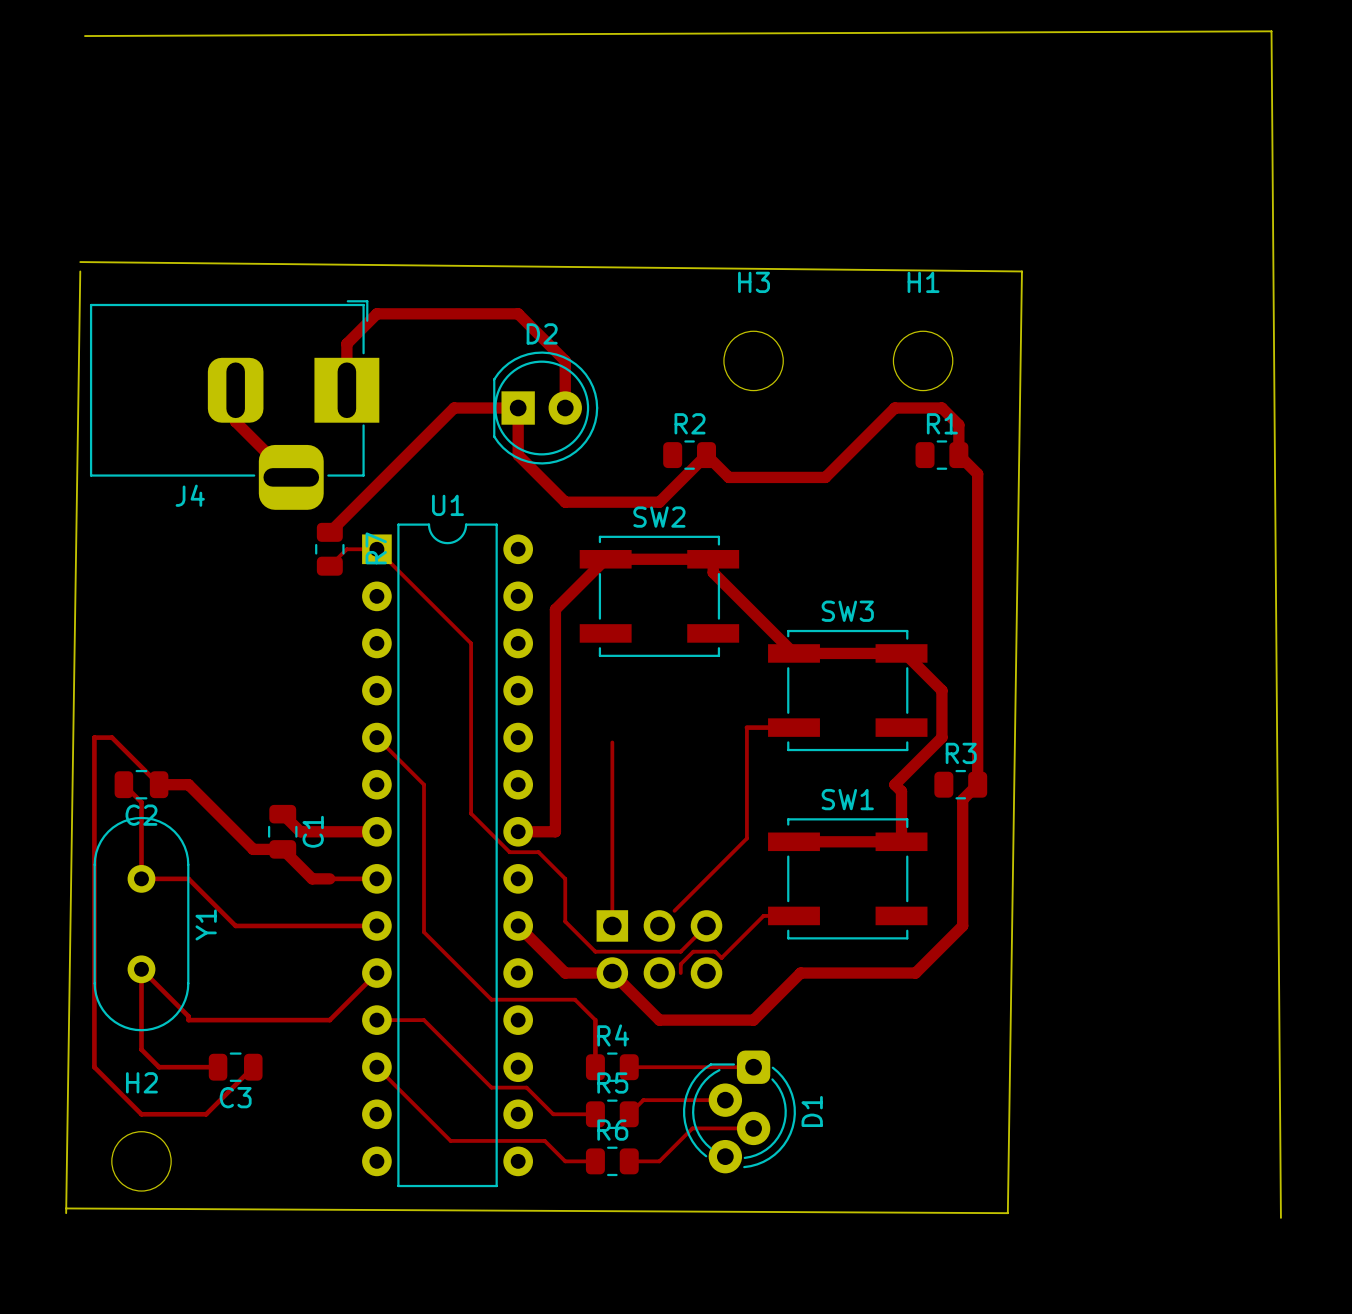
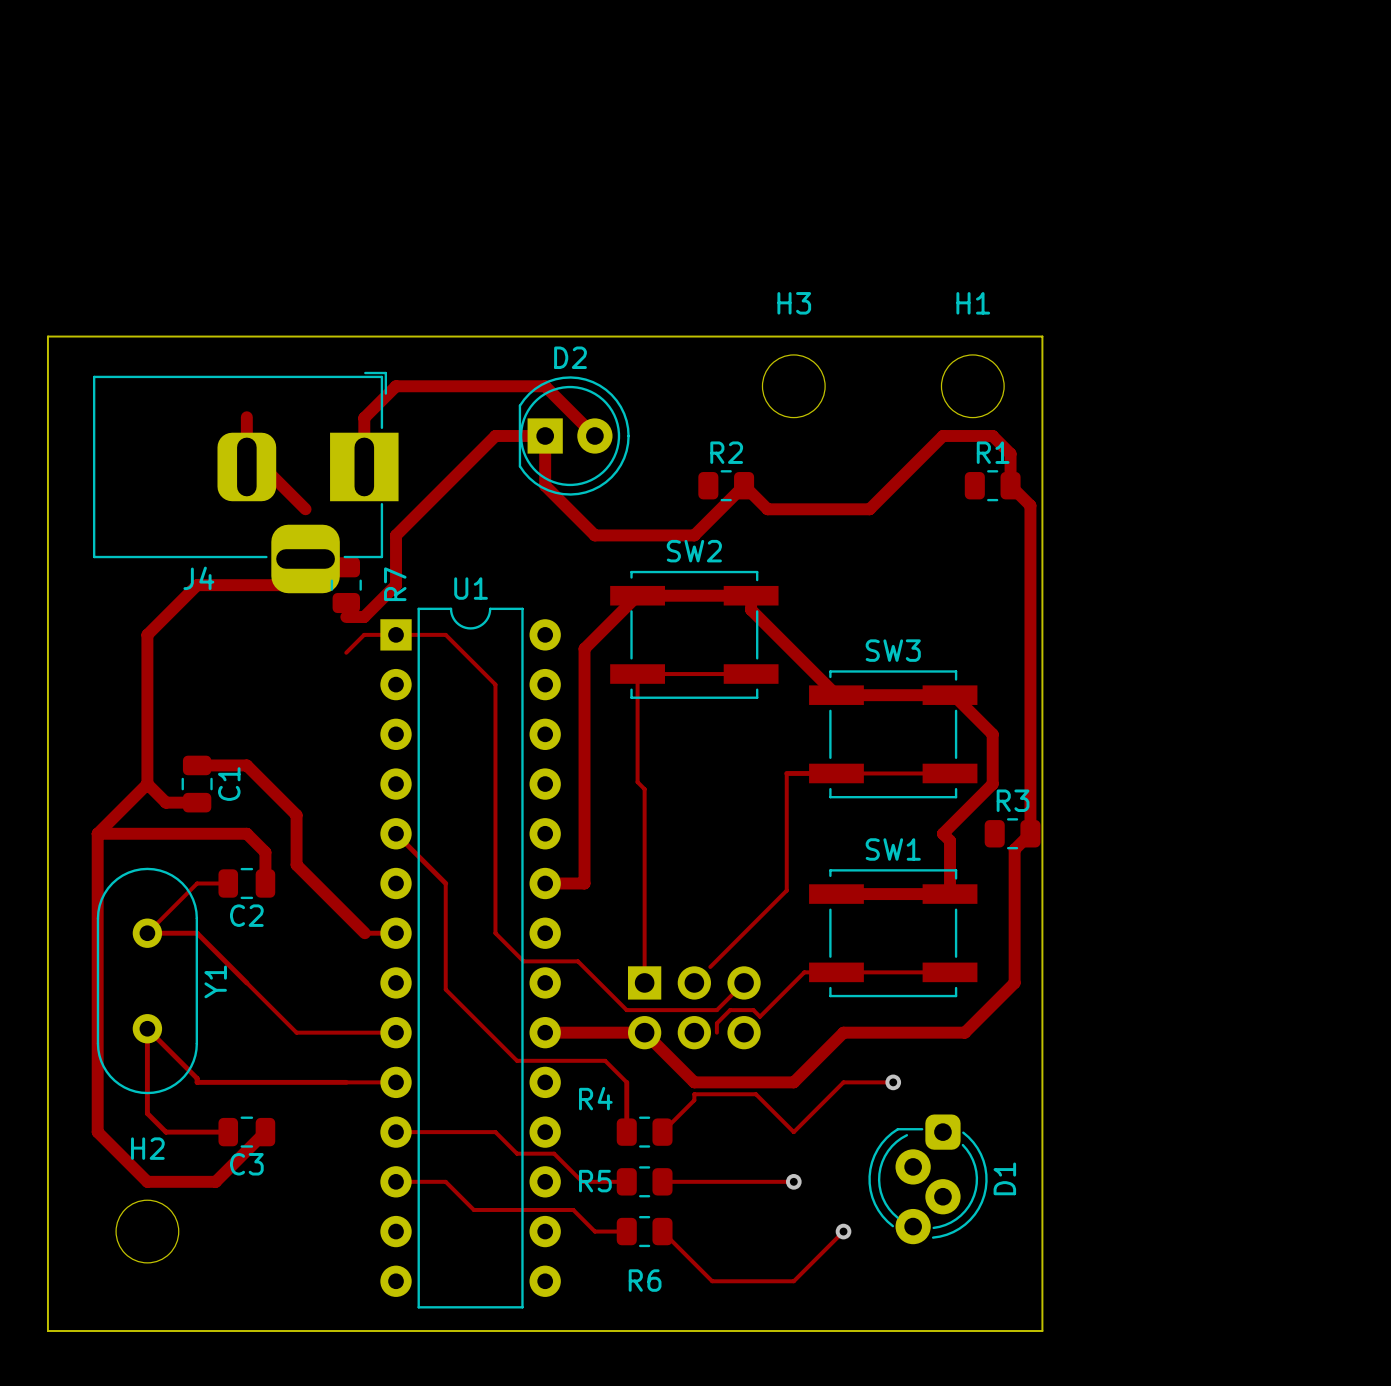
board edge: (84, 36) (1271, 31) (1280, 1217) -> none
board edge: (80, 262) (1021, 271) (1007, 1213) (66, 1208) -> none
board edge: (80, 271) (66, 1213) -> none
board edge: none -> (47, 336) (47, 1331) (1042, 1331) (1042, 336) (47, 336)
track: (346, 390) (346, 343) (376, 313) (518, 313) (565, 360) (565, 408) -> (364, 466) (364, 417) (396, 386) (545, 386) (594, 435)
J4 position: (234, 405) -> (245, 482)
track: (471, 408) (454, 408) (329, 532) -> (495, 435) (396, 535) (396, 585) (364, 617) (346, 617)
track: none -> (305, 558) (279, 585) (197, 585) (147, 634) (147, 784)
track: (329, 566) (346, 549) (376, 549) (424, 596) -> (346, 652) (364, 634) (445, 634)
track: none -> (751, 674) (637, 674) (637, 782) (644, 789)
track: none -> (197, 765) (246, 765) (296, 815) (296, 864)
track: none -> (836, 773) (950, 773)
track: none -> (147, 784) (166, 802) (197, 802)
track: (376, 737) (424, 784) (424, 831) -> (396, 833) (445, 883)
track: (94, 784) (94, 737) (112, 737) (159, 784) -> (147, 784) (97, 833) (166, 833)
track width: thin (94, 784) (94, 1067) (141, 1114) (206, 1114) (253, 1067) -> thick (97, 833) (97, 1132) (147, 1181) (215, 1181) (265, 1132)
track: (123, 784) (141, 802) (141, 878) -> (228, 883) (197, 883) (147, 933)
C2 position: (141, 784) -> (246, 883)
track: (188, 784) (253, 849) (282, 849) (312, 878) (347, 878) -> (197, 833) (246, 833) (265, 852) (265, 883)
track: (471, 813) (509, 852) (538, 852) (565, 878) (565, 921) -> (495, 864) (495, 933) (523, 961) (577, 961) (594, 978)
C1 position: (282, 831) -> (197, 784)
track: (300, 831) (376, 831) -> (315, 883) (364, 933)
U1 position: (447, 855) -> (470, 958)
track: none -> (836, 972) (950, 972)
track: (235, 925) (376, 925) -> (246, 982) (296, 1032) (396, 1032)
track: (518, 925) (565, 973) -> (545, 1032) (594, 1032)
track: (376, 973) (329, 1020) -> (388, 1082) (346, 1082)
track: (376, 1020) (424, 1020) (471, 1067) -> (396, 1132) (495, 1132)
via: none -> (893, 1082)
R4 name position: R4 (613, 1035) -> R4 (595, 1098)
track: (376, 1067) (424, 1114) -> (396, 1181) (445, 1181)
track: (629, 1067) (753, 1067) -> (662, 1132) (694, 1100) (694, 1094) (755, 1094) (793, 1132) (843, 1082) (893, 1082)
R5 name position: R5 (612, 1083) -> R5 (595, 1181)
track: (725, 1100) (643, 1100) (629, 1114) -> (793, 1181) (662, 1181)
D1 position: (739, 1111) -> (928, 1179)
via: none -> (793, 1181)
track: (753, 1128) (692, 1128) (659, 1161) (629, 1161) -> (843, 1231) (793, 1281) (712, 1281) (662, 1231)
R6 name position: R6 (612, 1130) -> R6 (645, 1280)
via: none -> (843, 1231)

